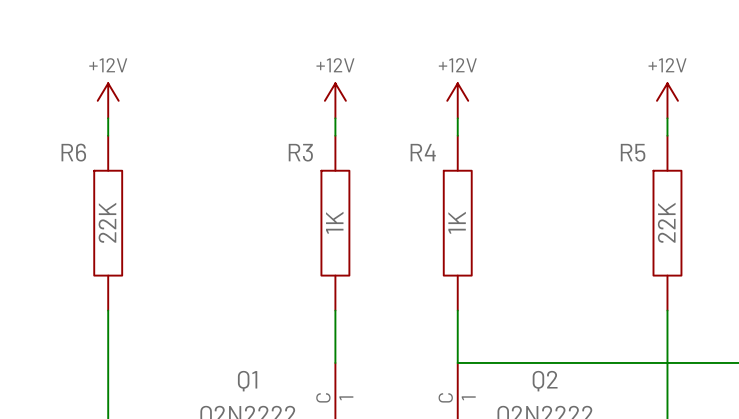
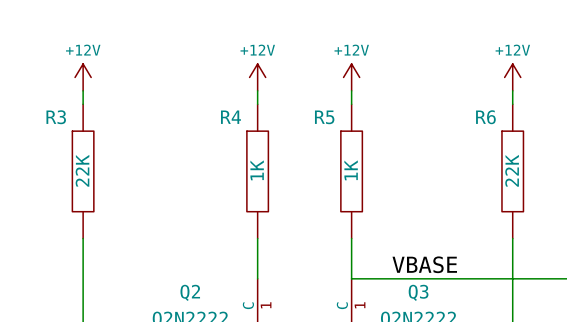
R6 name: R6 (73, 152) -> R3 (56, 117)
R3 name: R3 (300, 152) -> R4 (230, 117)
R4 name: R4 (423, 152) -> R5 (324, 117)
R5 name: R5 (633, 152) -> R6 (485, 117)
label: none -> VBASE (424, 264)
Q1 name: Q1 (247, 381) -> Q2 (190, 292)
Q2 name: Q2 (545, 381) -> Q3 (418, 292)

